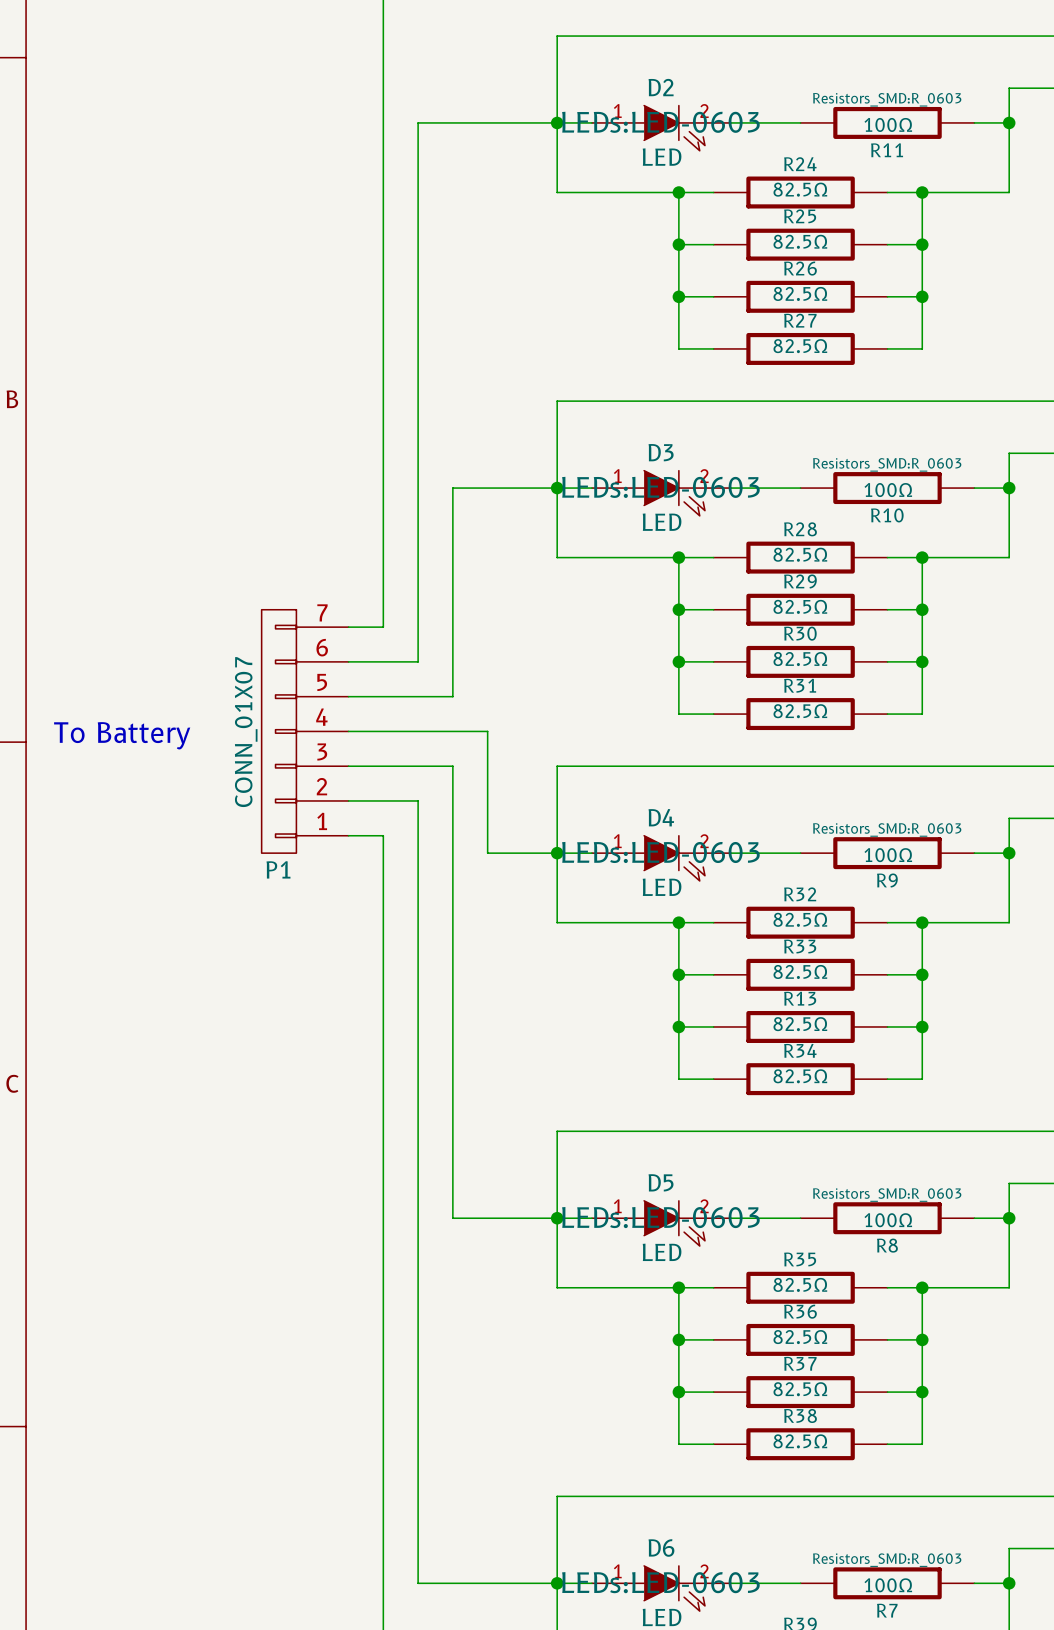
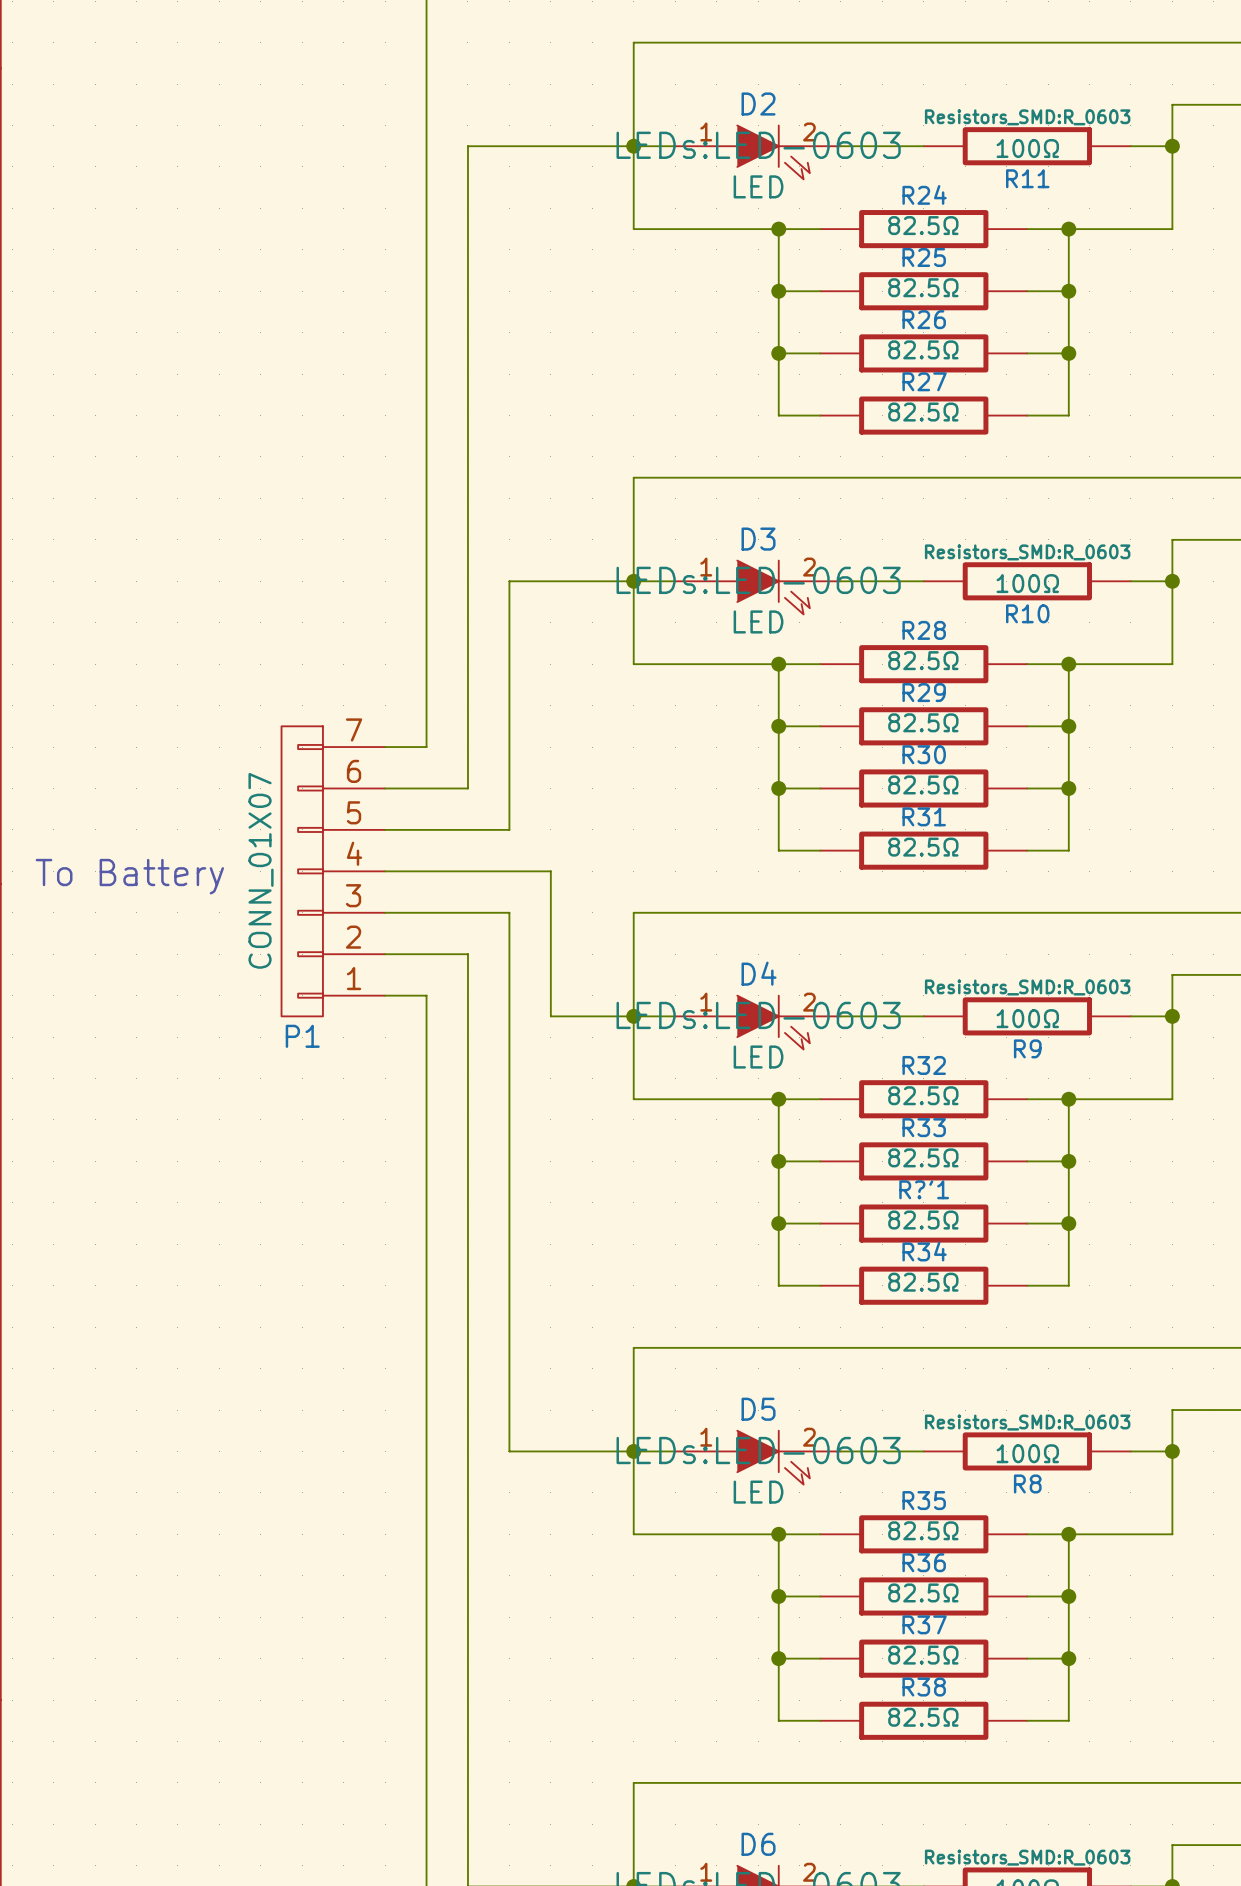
R13 name: R13 (800, 998) -> R?'1 (924, 1189)

